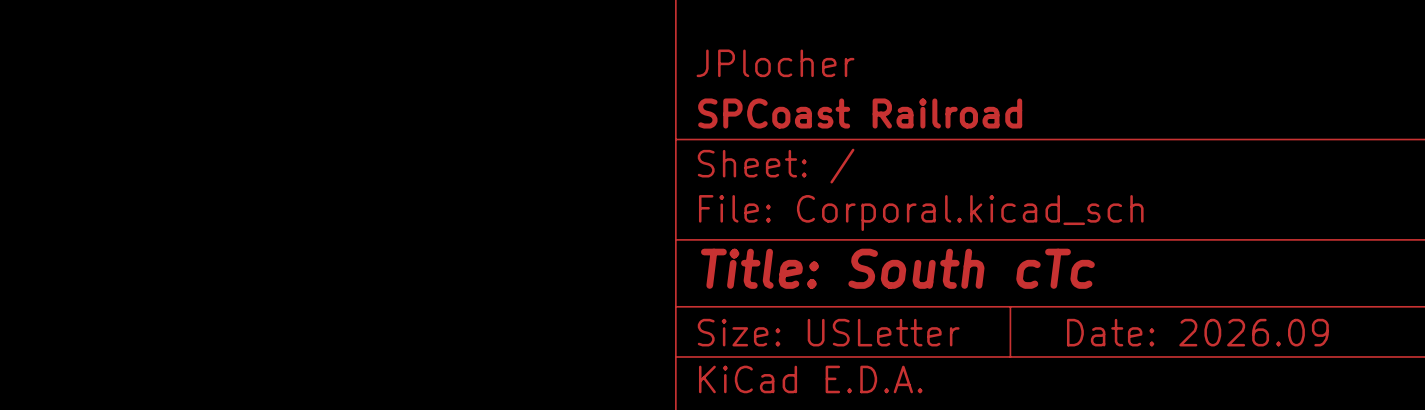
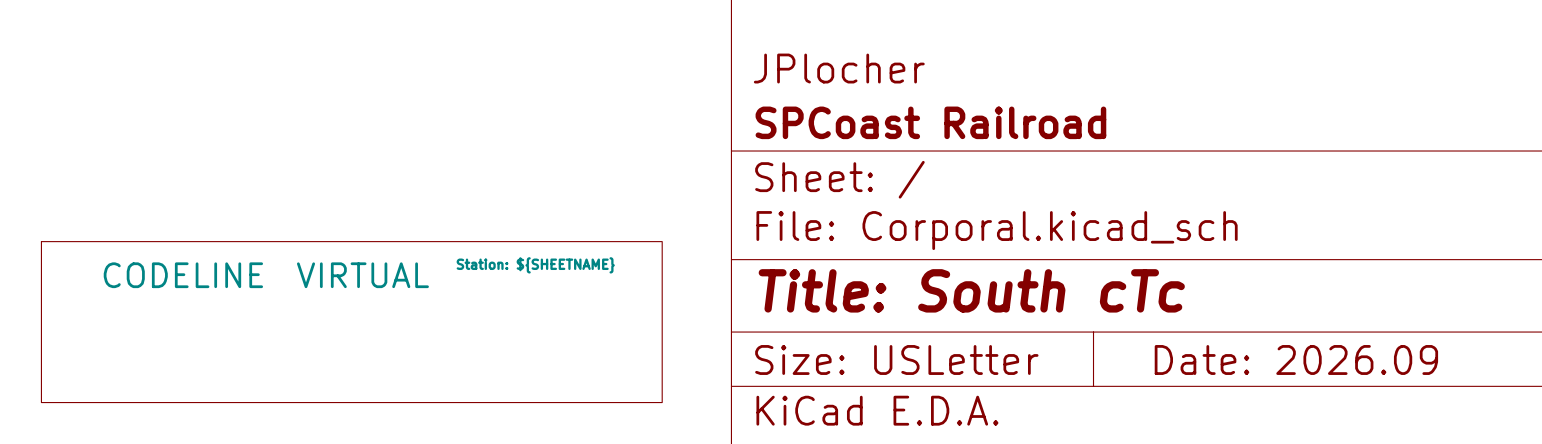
part: none -> VIRTUAL (351, 322)

